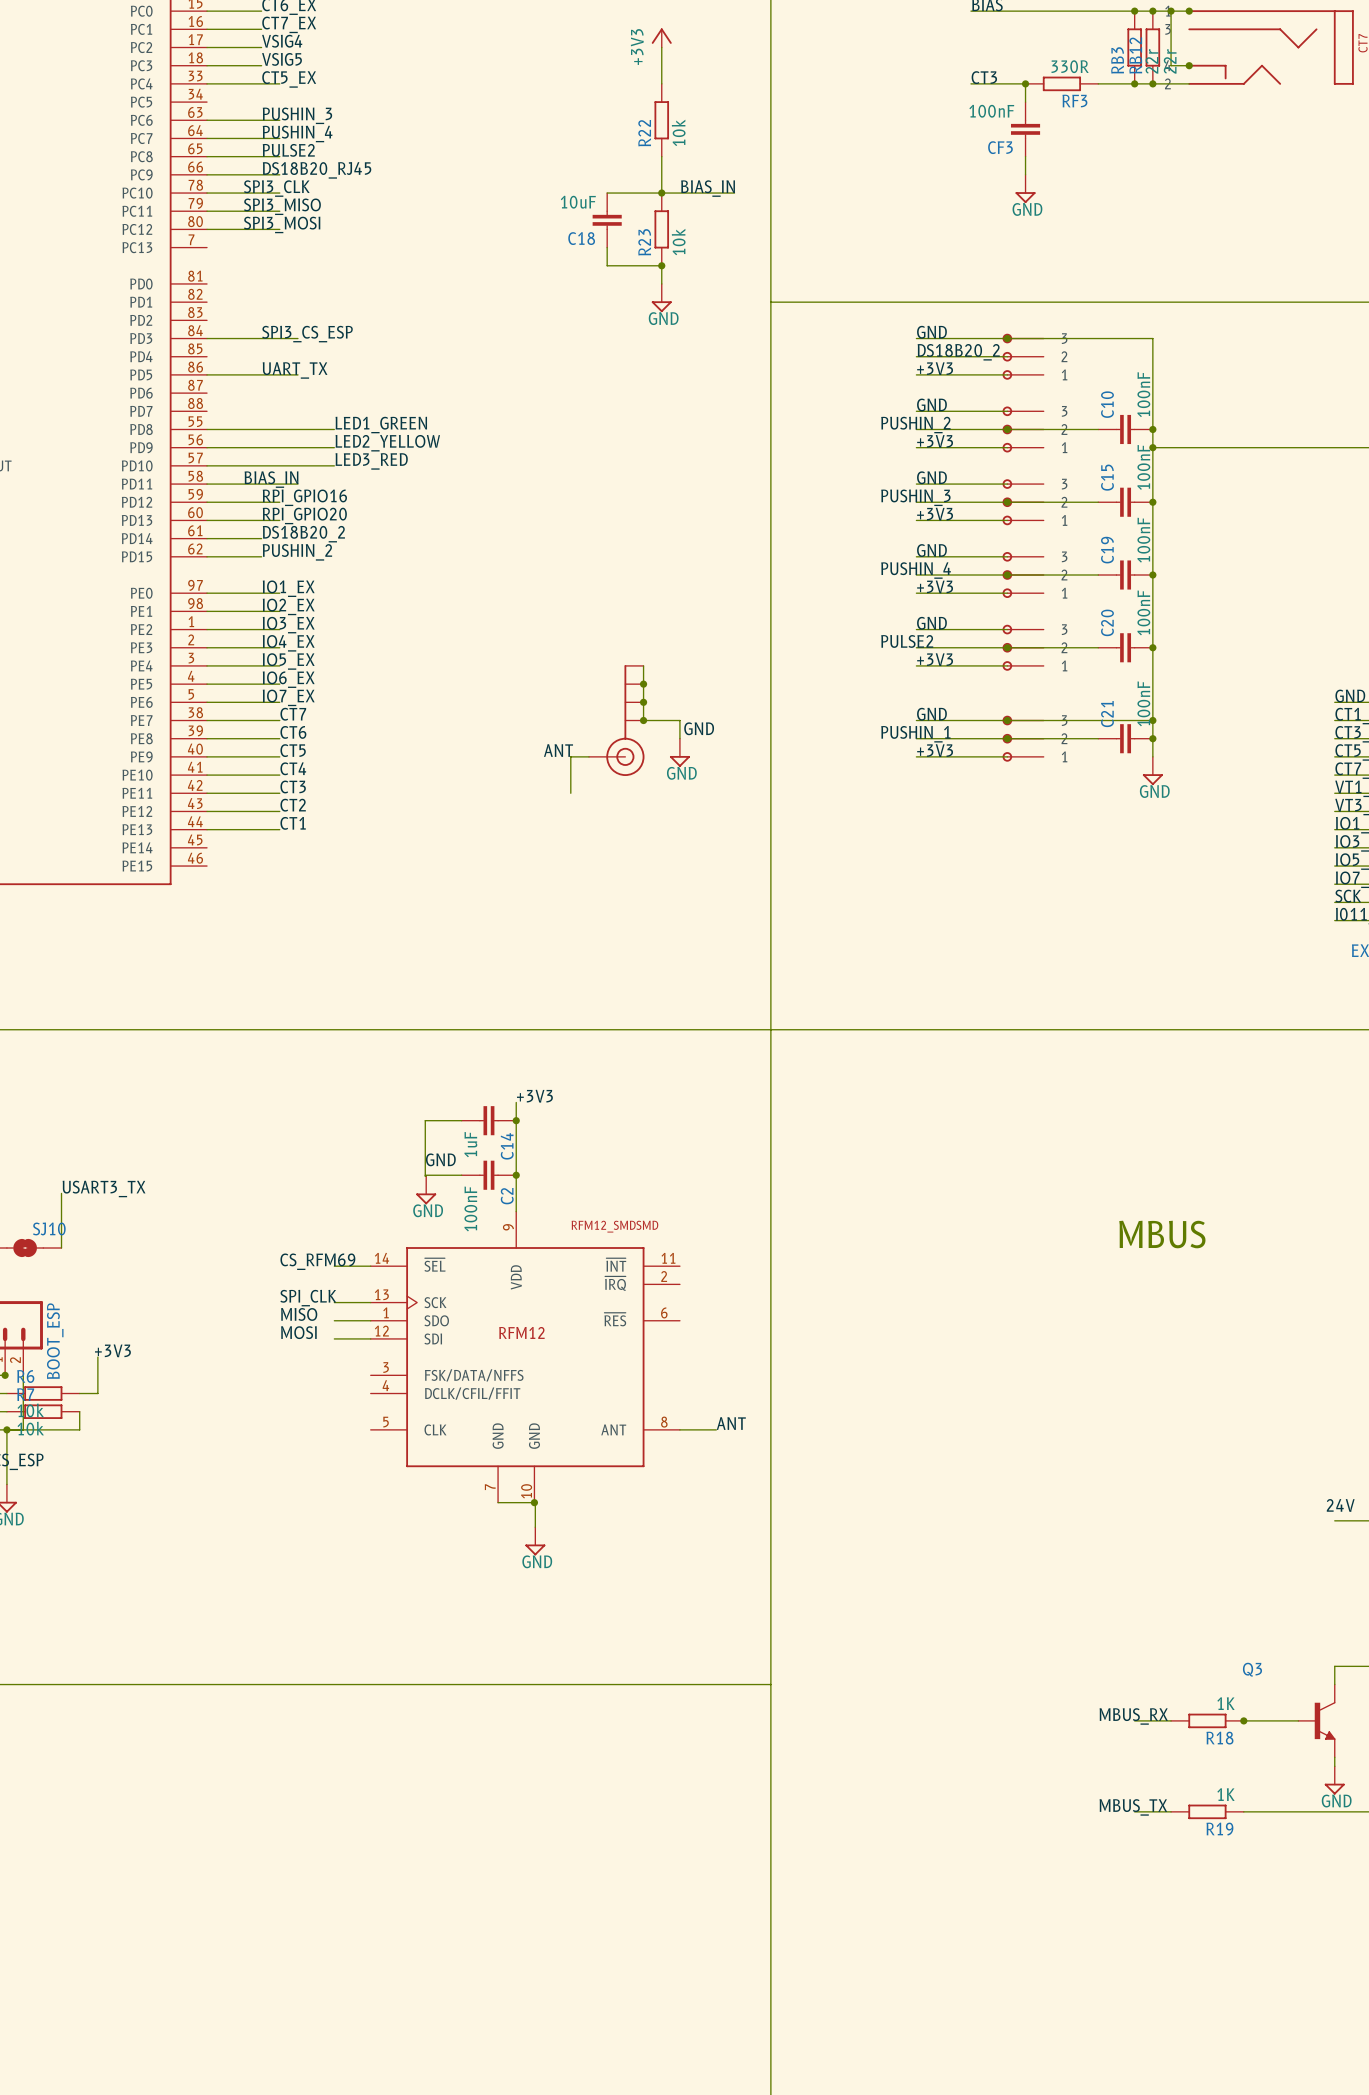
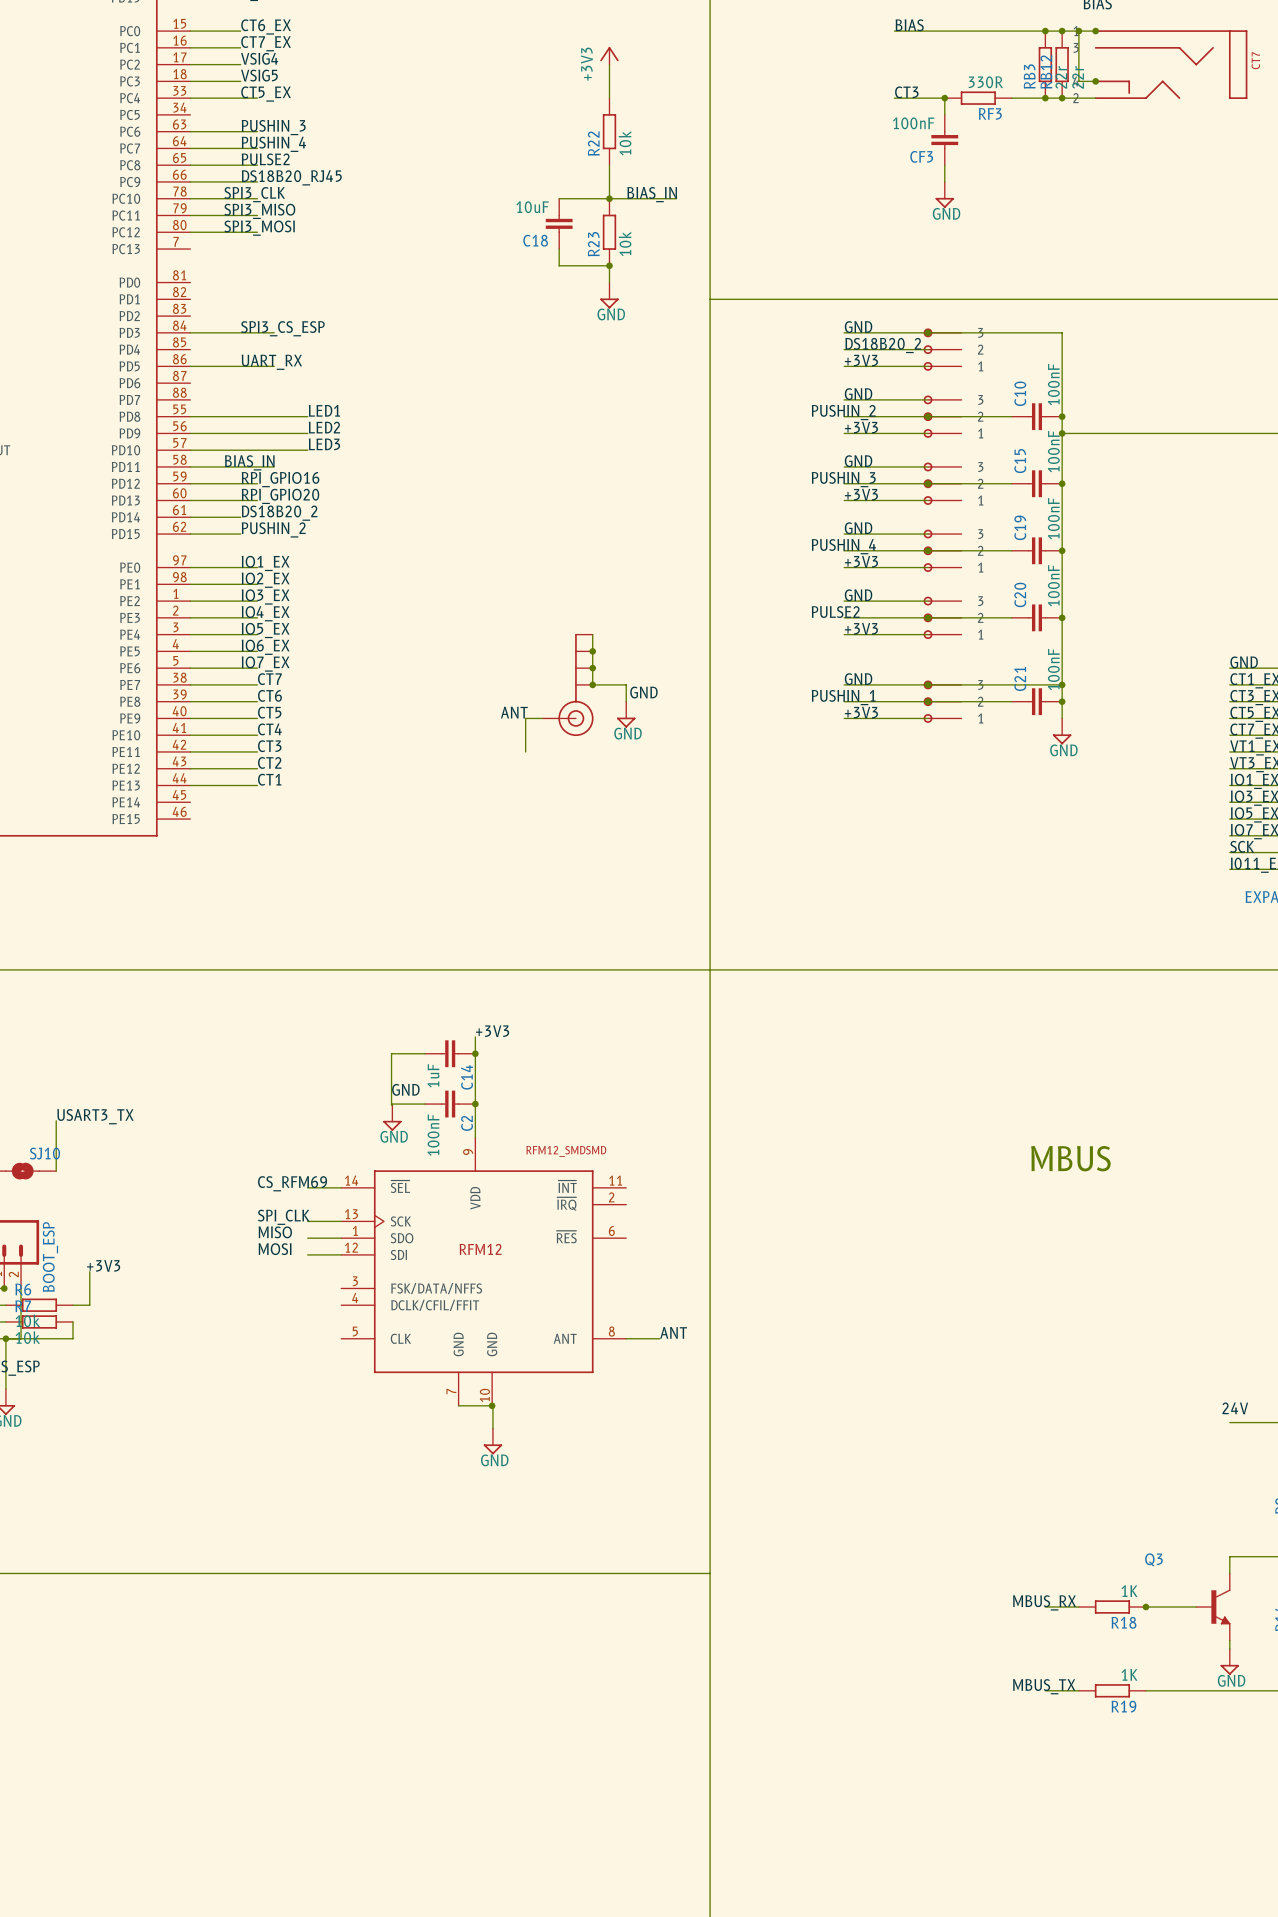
label: UART_TX (295, 370) -> UART_RX (271, 362)
label: LED1_GREEN (381, 425) -> LED1 (324, 410)
label: LED2_YELLOW (387, 443) -> LED2 (324, 427)
label: LED3_RED (371, 461) -> LED3 (324, 444)

